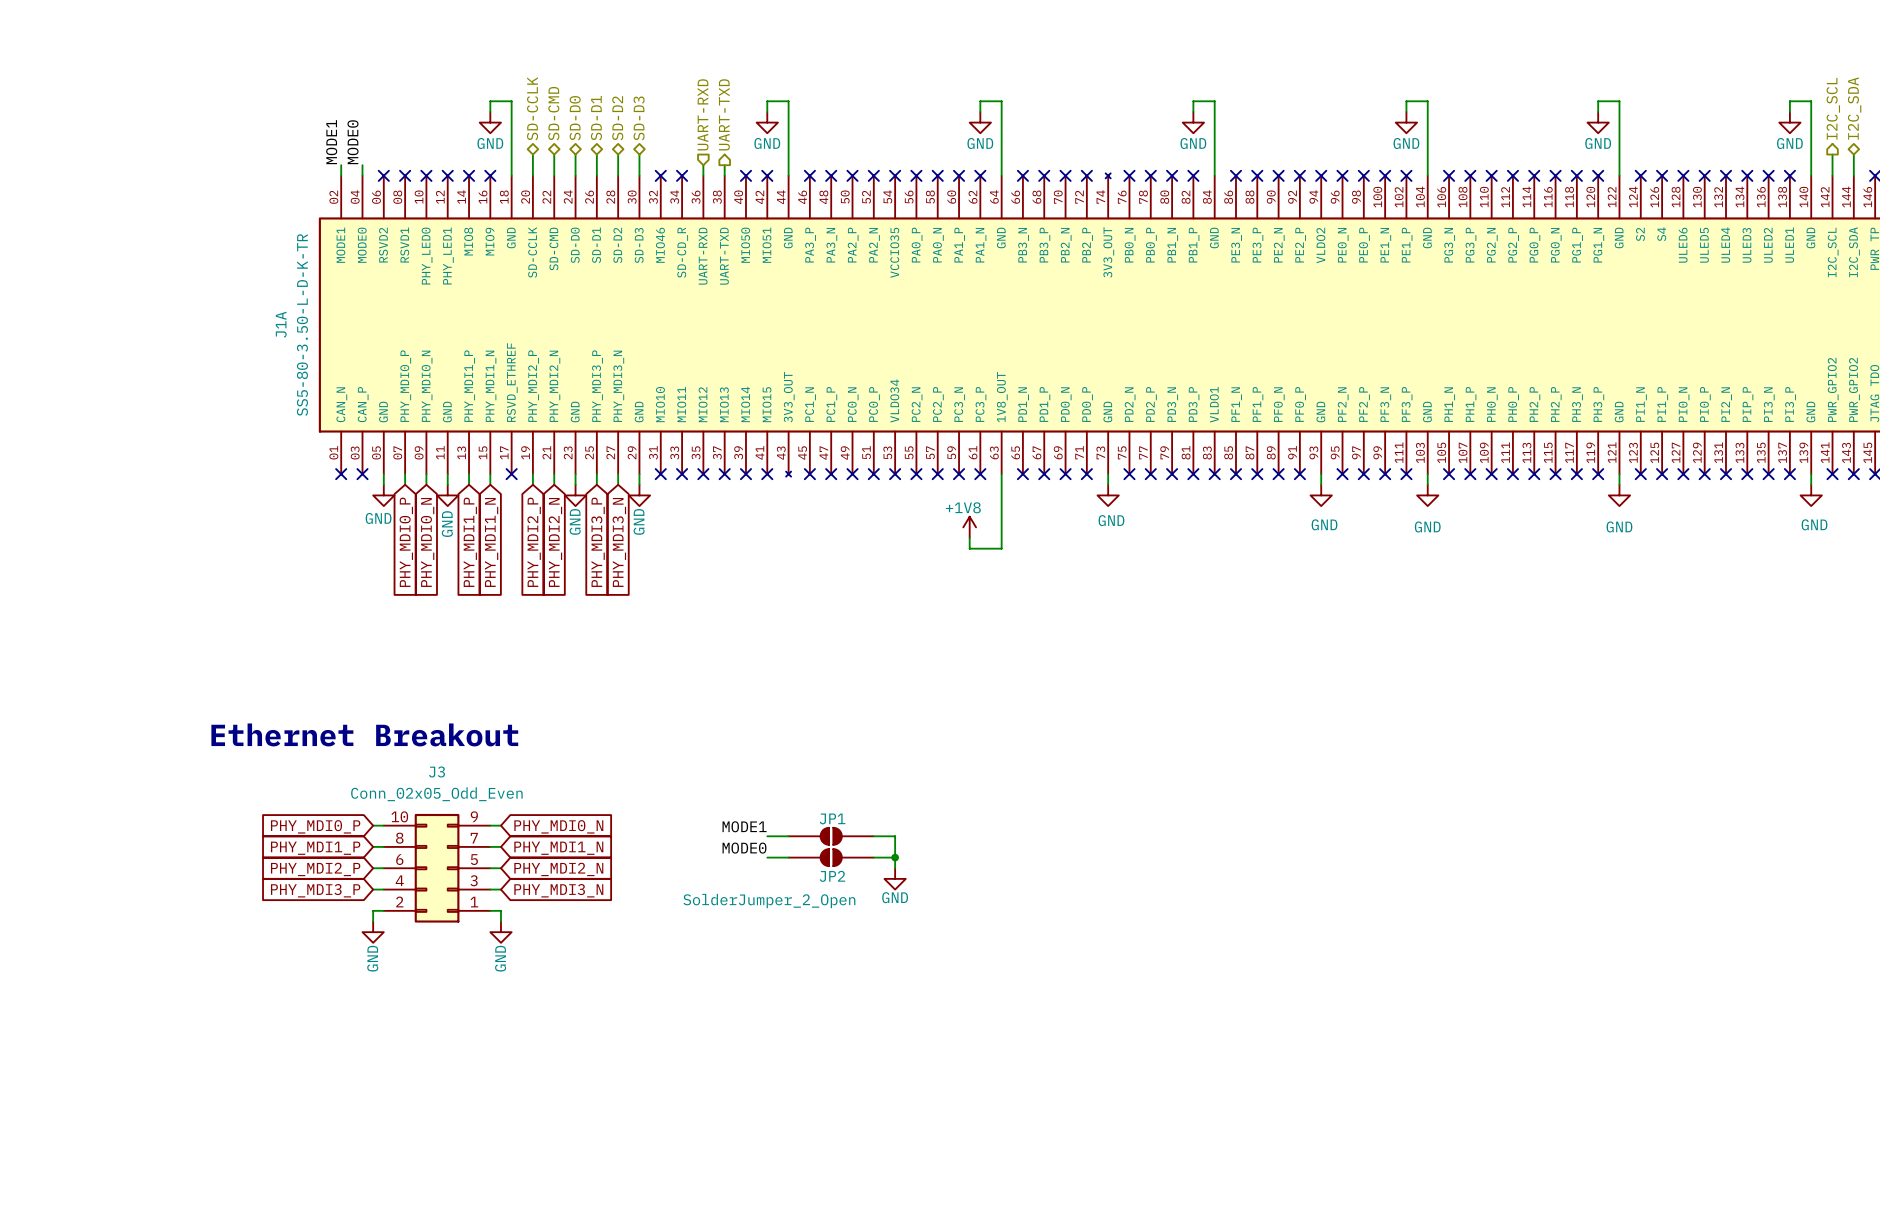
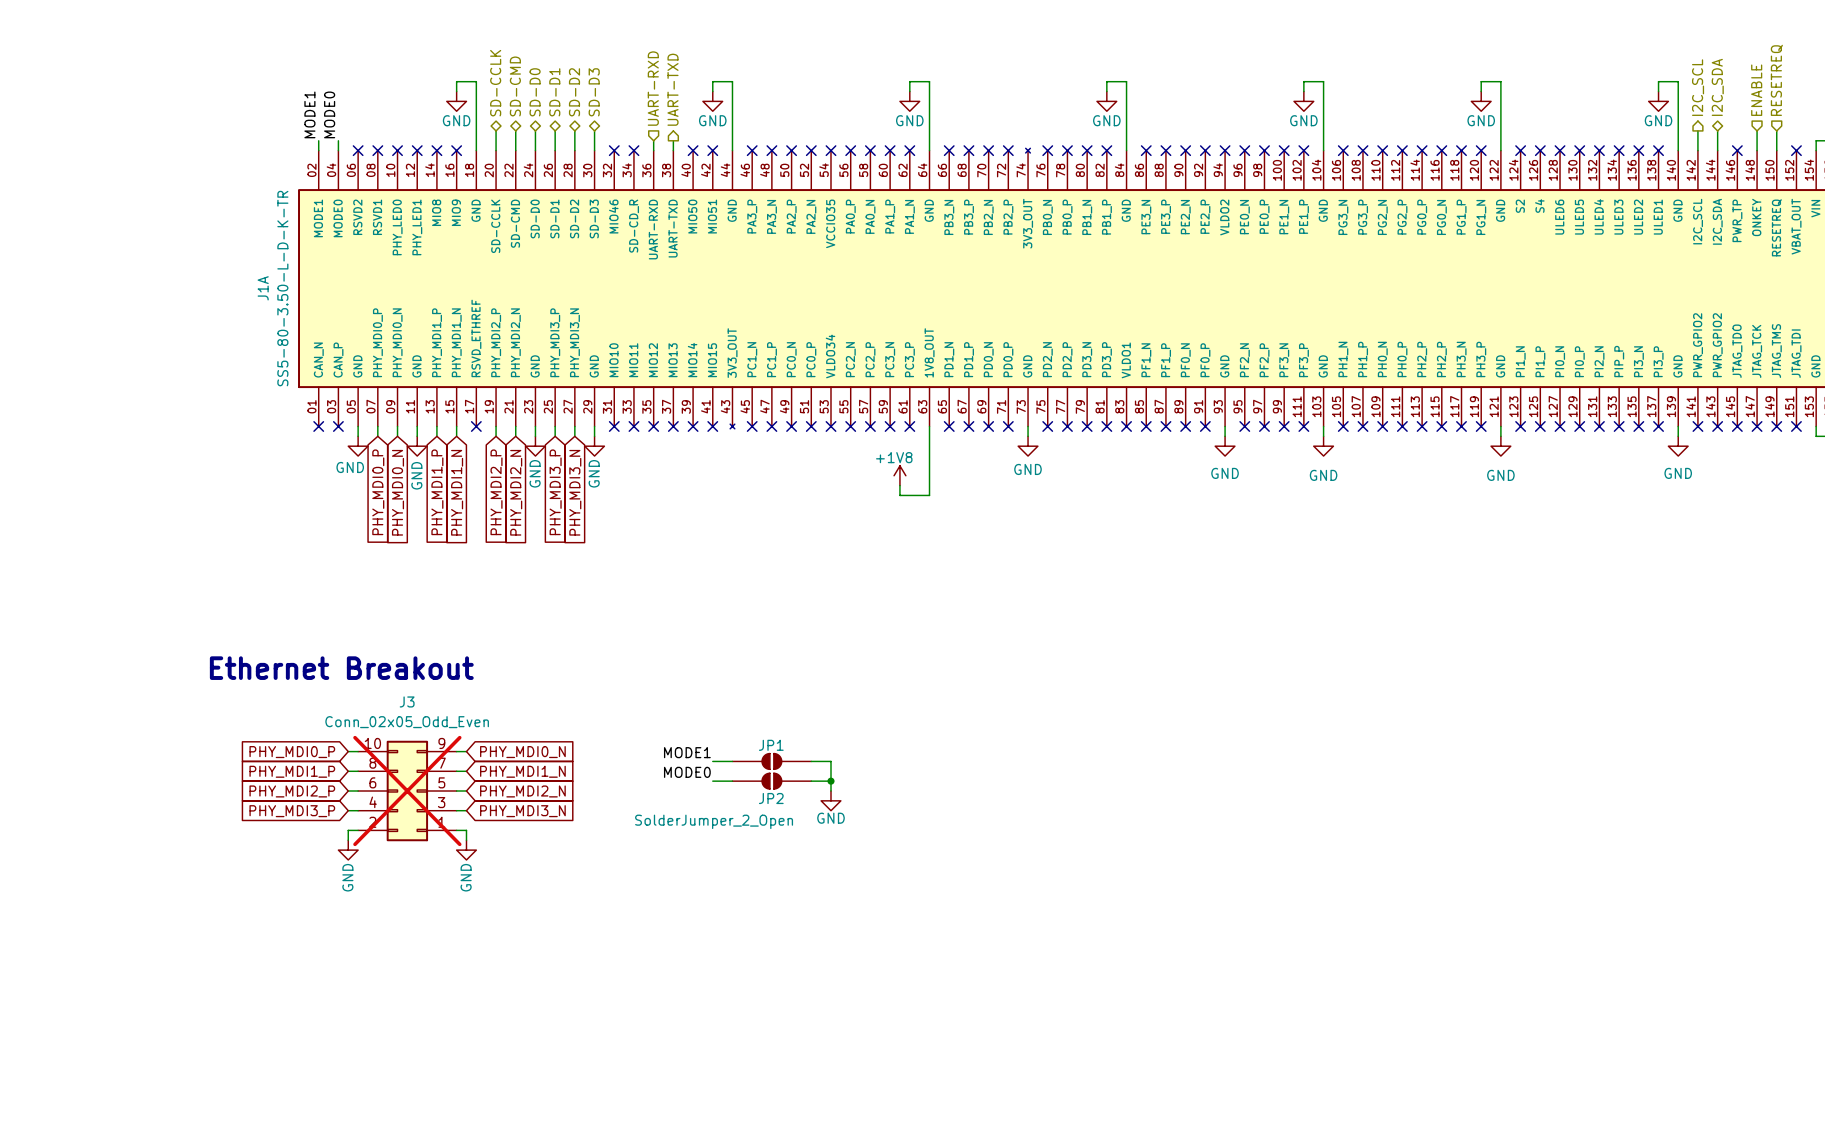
J3 do-not-place cross: none -> (407, 791)

